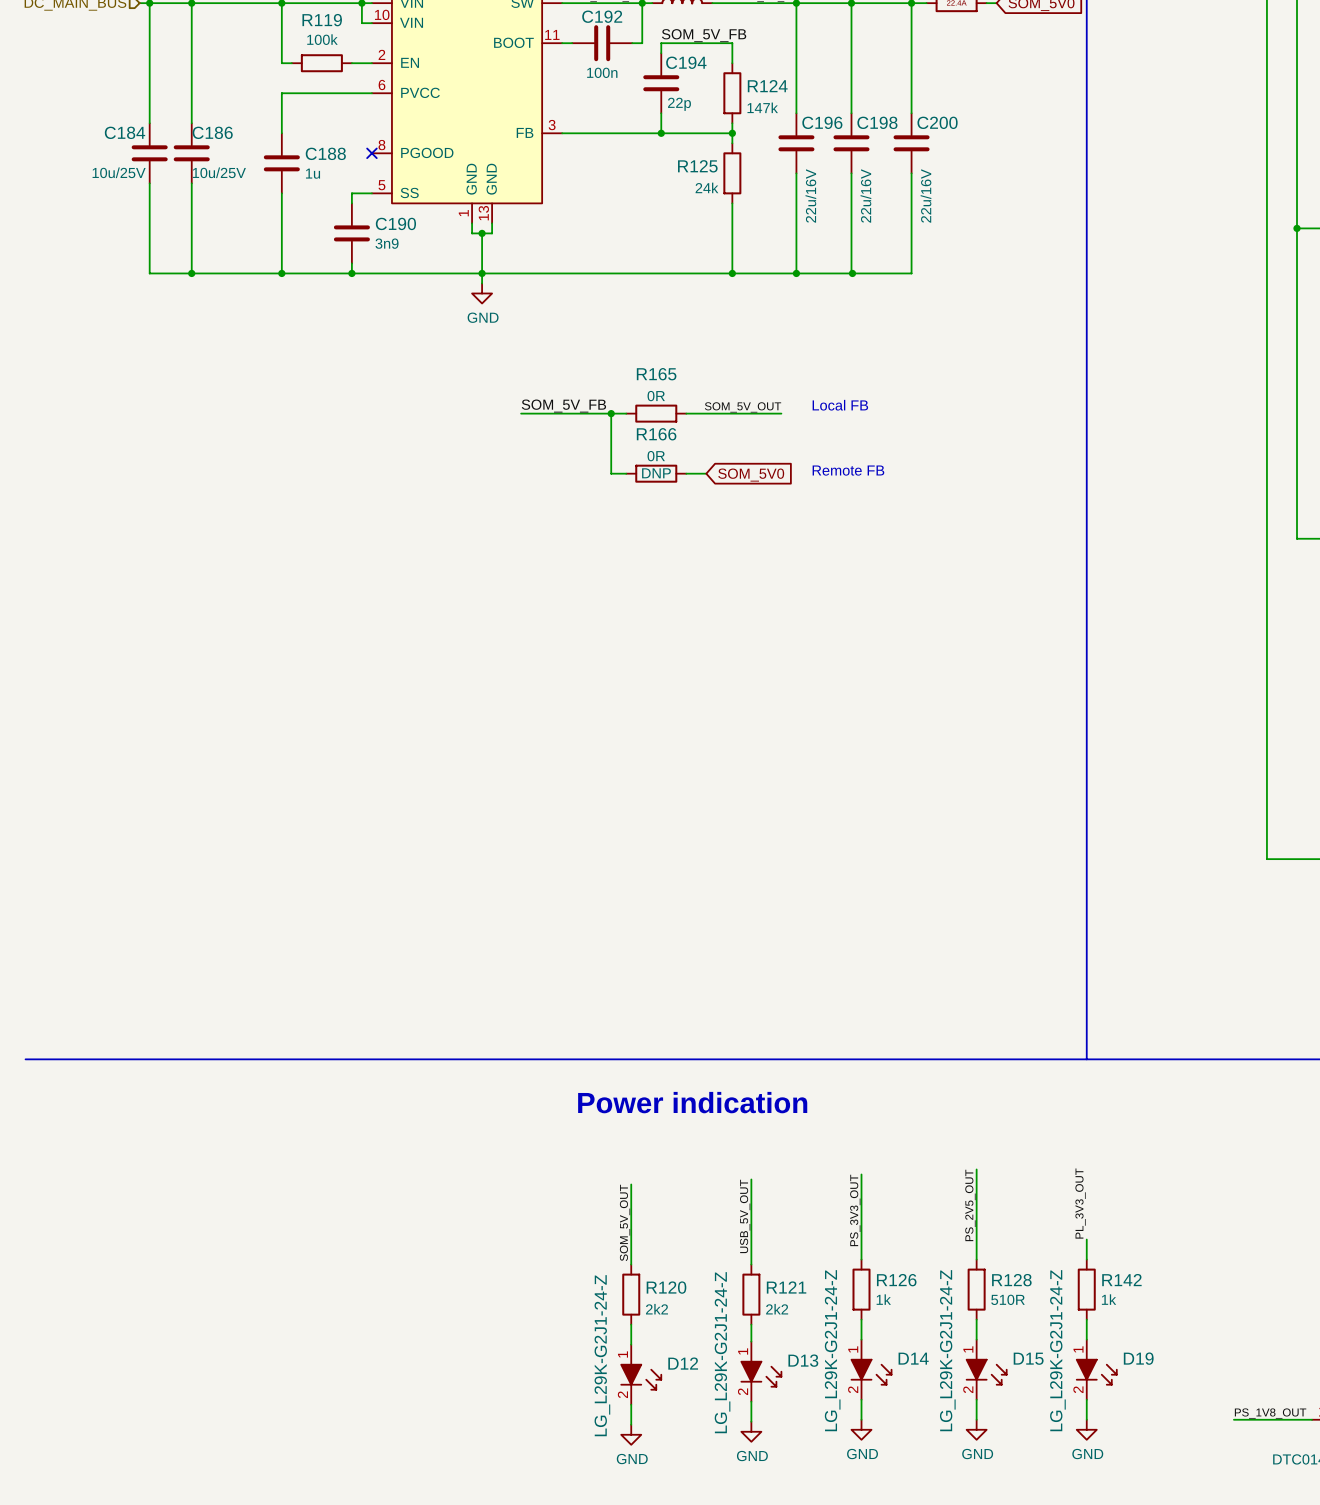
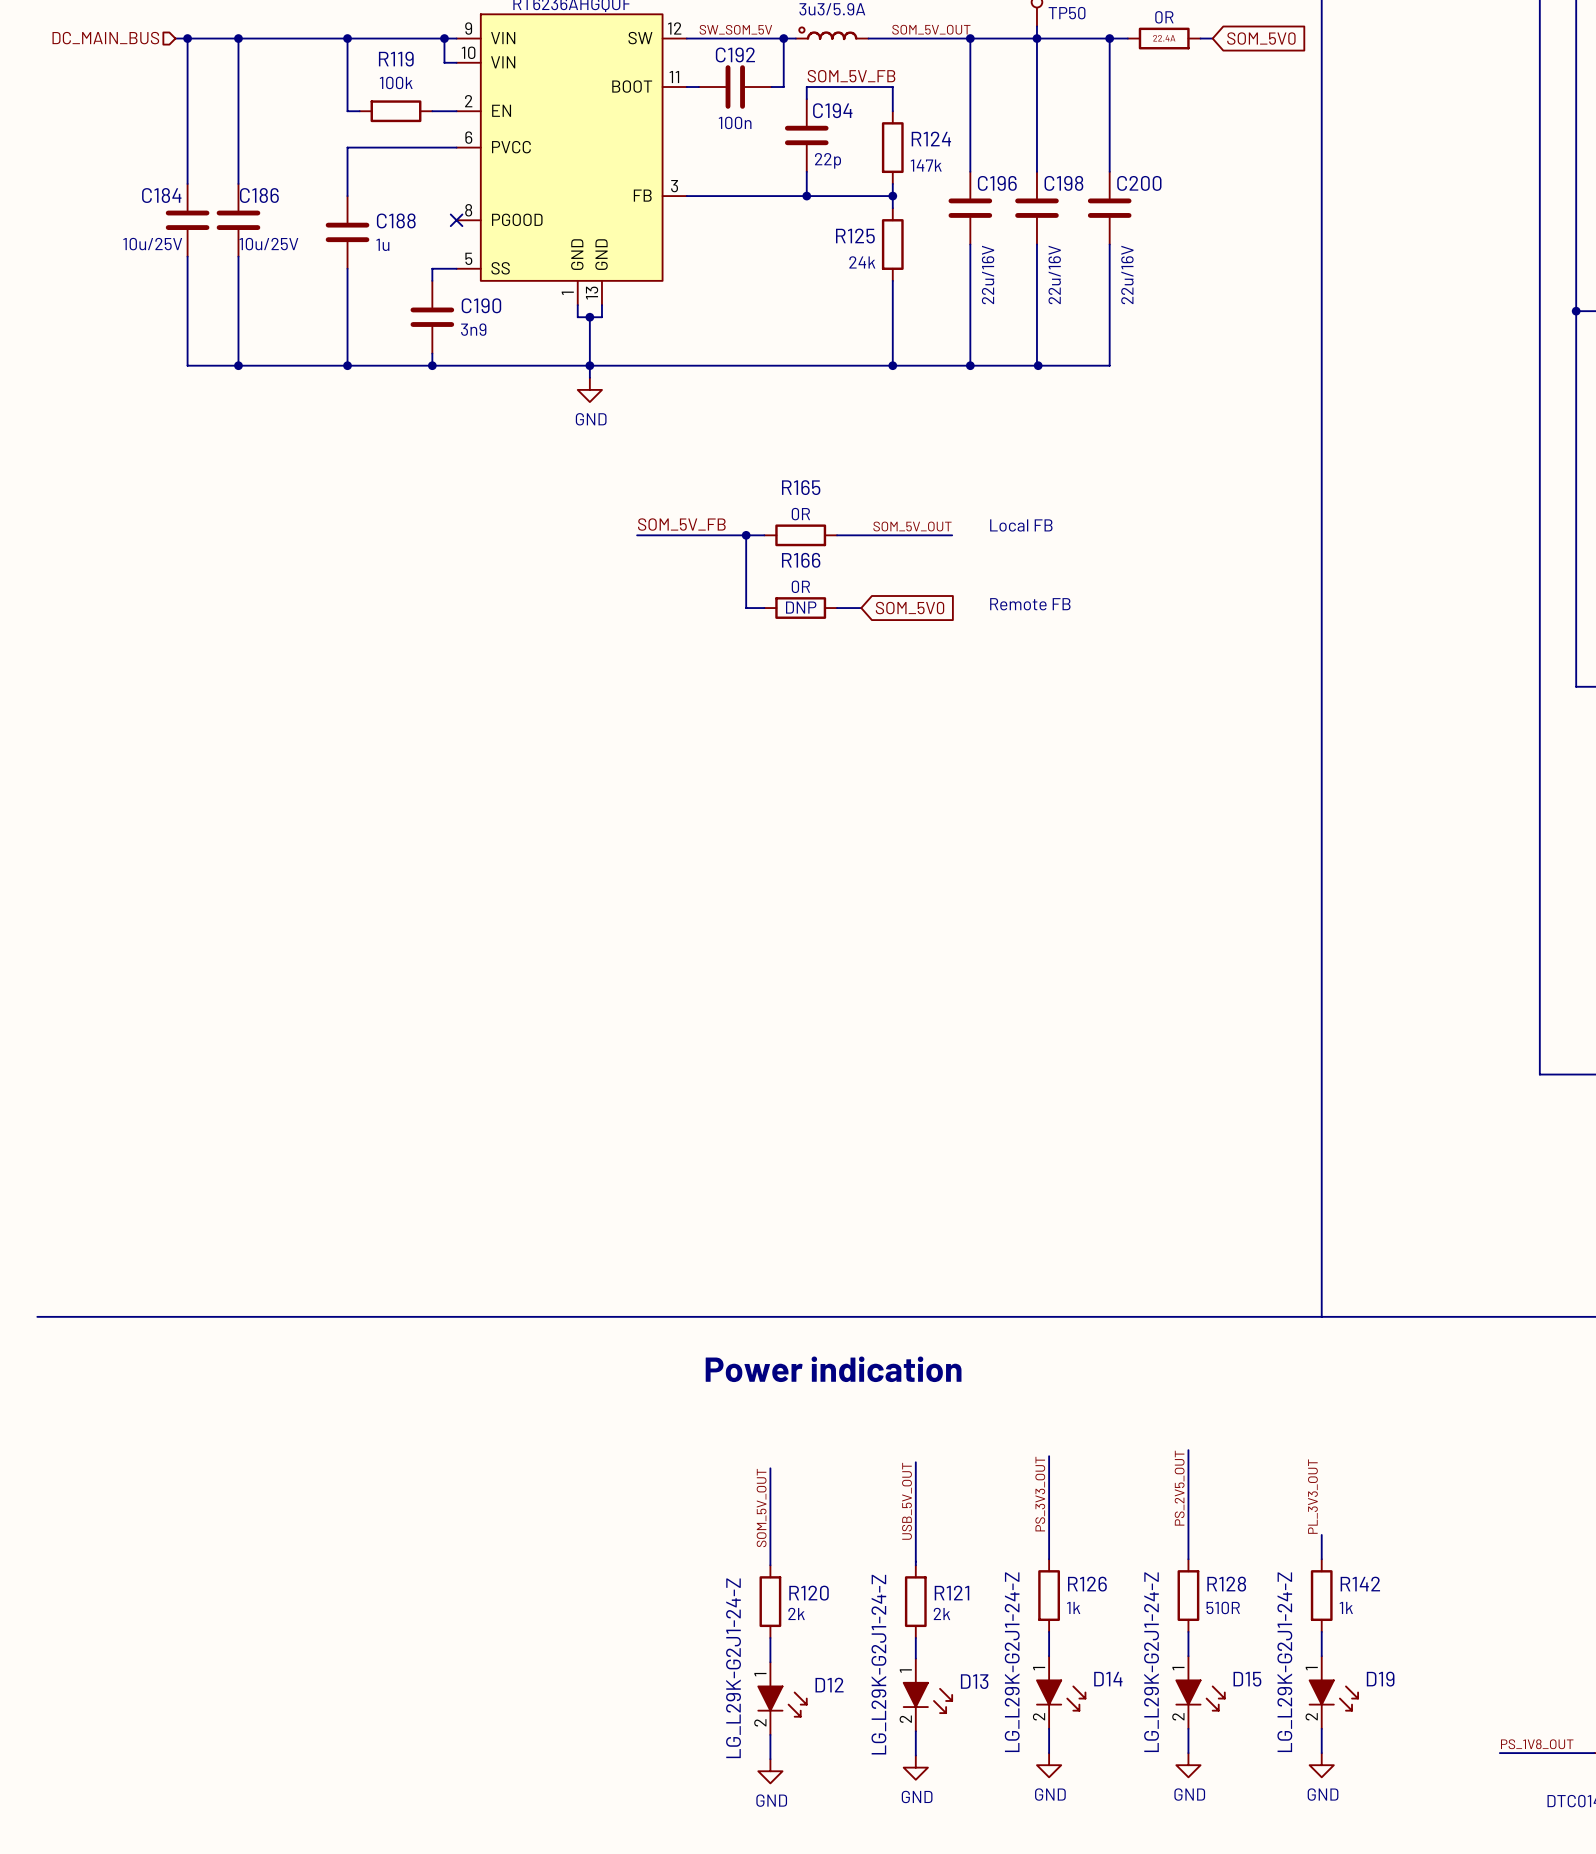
R120 text: 2k2 (656, 1309) -> 2k (796, 1613)
R121 text: 2k2 (777, 1309) -> 2k (941, 1613)

